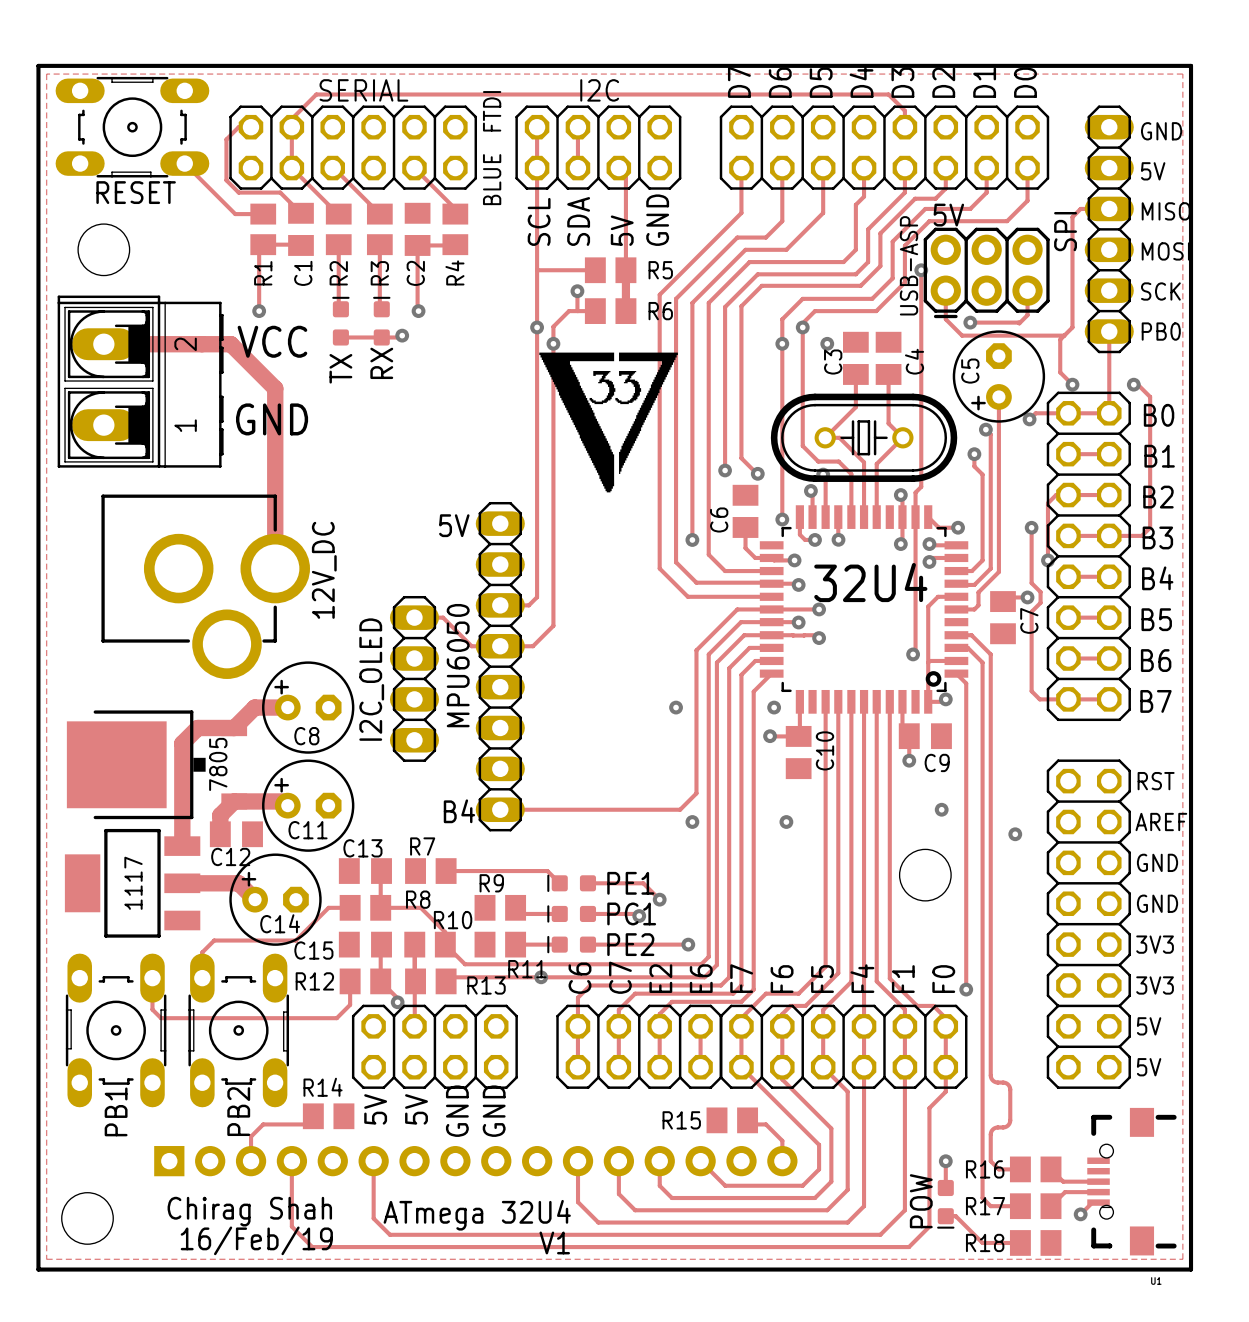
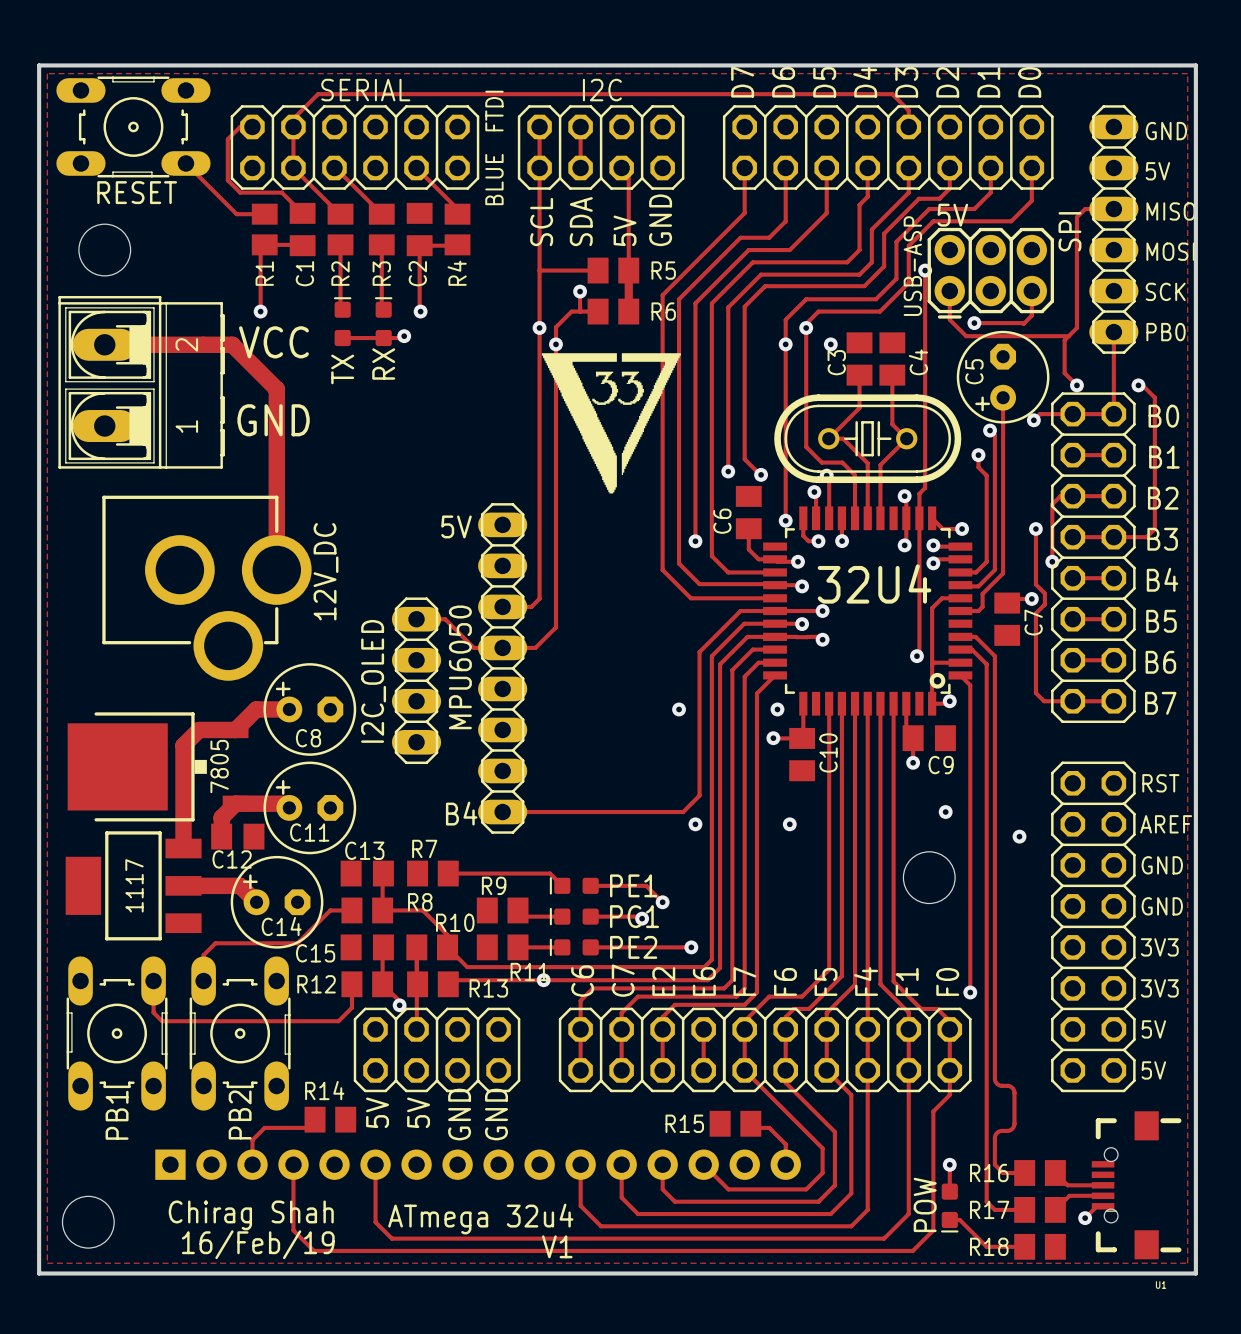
text: ATmega 32U4 (477, 1215) -> ATmega 32u4 (480, 1219)

